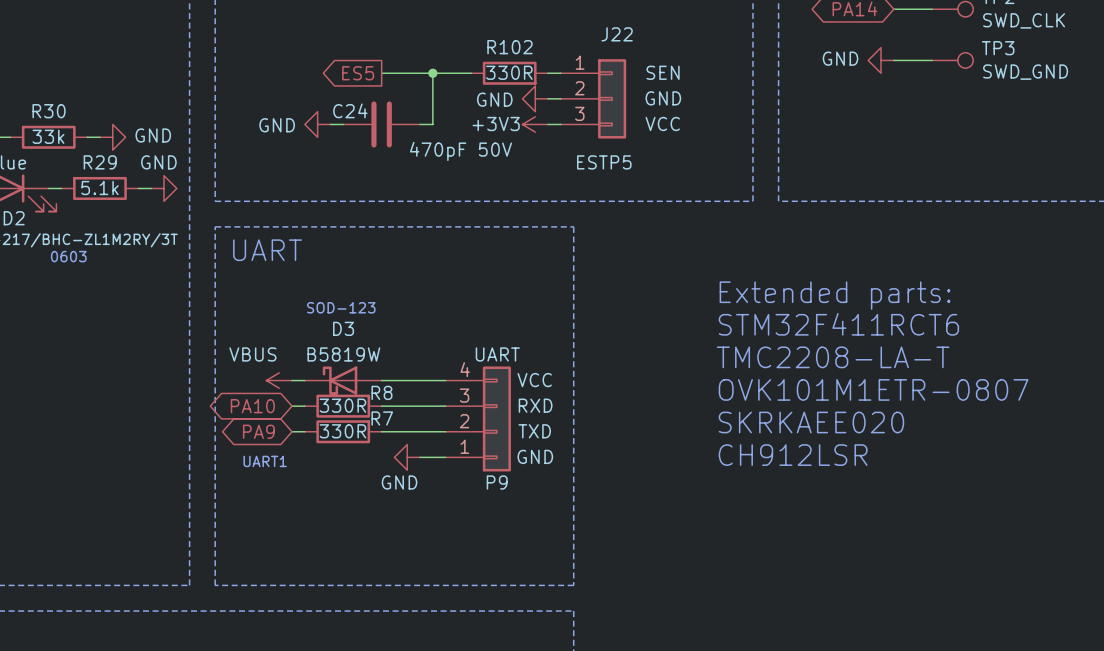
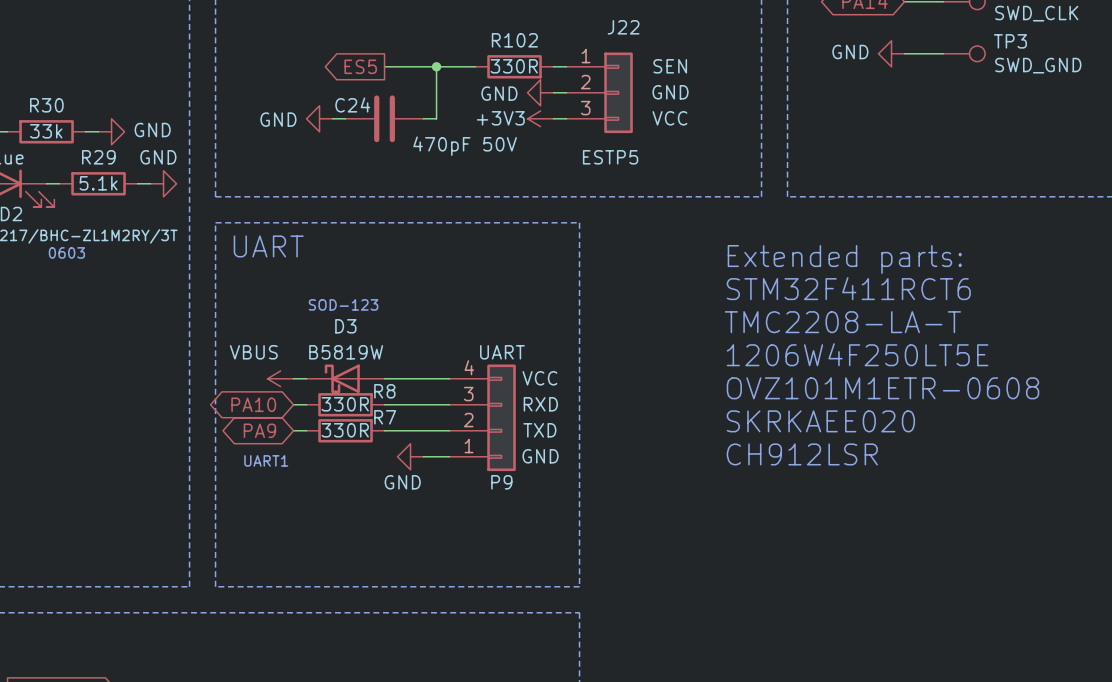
text: none -> Extended parts: (844, 259)
text: Extended parts: (835, 295) -> STM32F411RCT6 (848, 288)
text: STM32F411RCT6 (838, 324) -> TMC2208-LA-T (842, 322)
text: TMC2208-LA-T (833, 357) -> 1206W4F250LT5E (857, 354)
text: OVK101M1ETR-0807 (873, 389) -> OVZ101M1ETR-0608 (882, 388)

